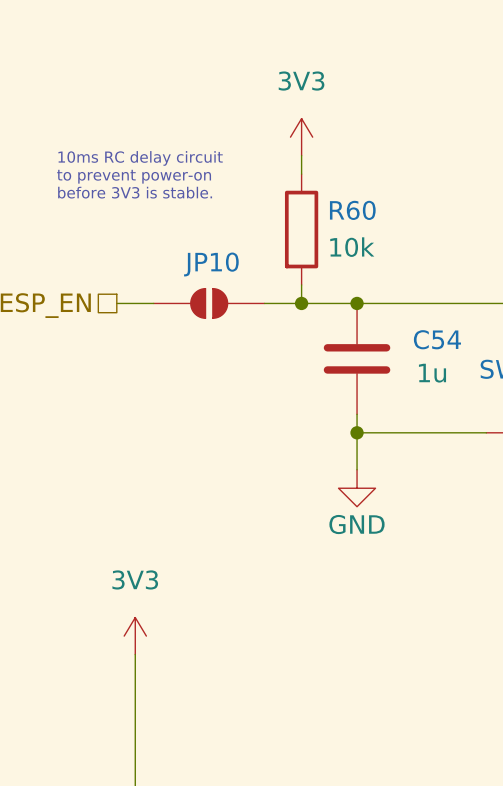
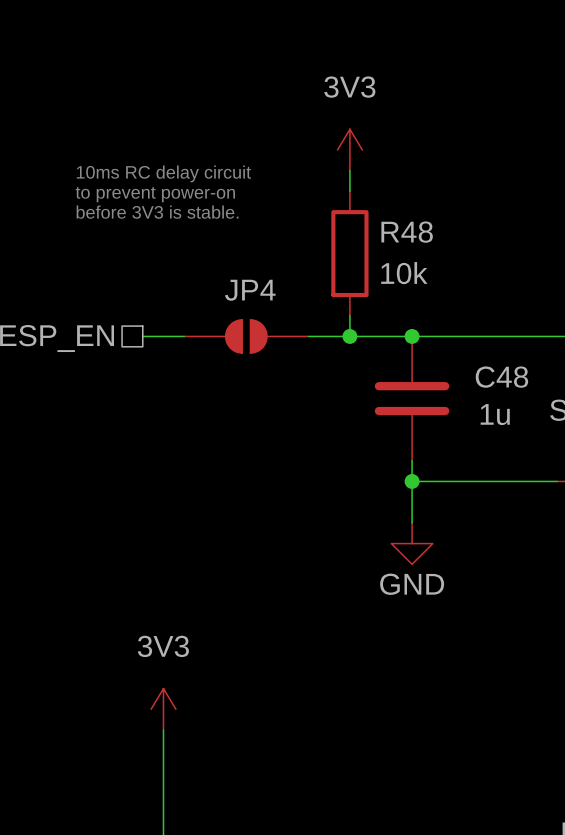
R60 name: R60 (352, 210) -> R48 (407, 232)
JP10 name: JP10 (211, 264) -> JP4 (250, 290)
C54 name: C54 (437, 339) -> C48 (501, 377)

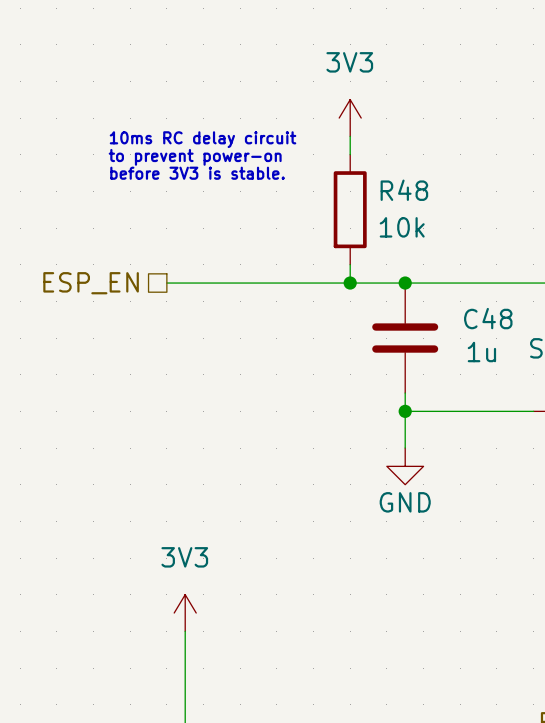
JP4: (246, 336) -> none

